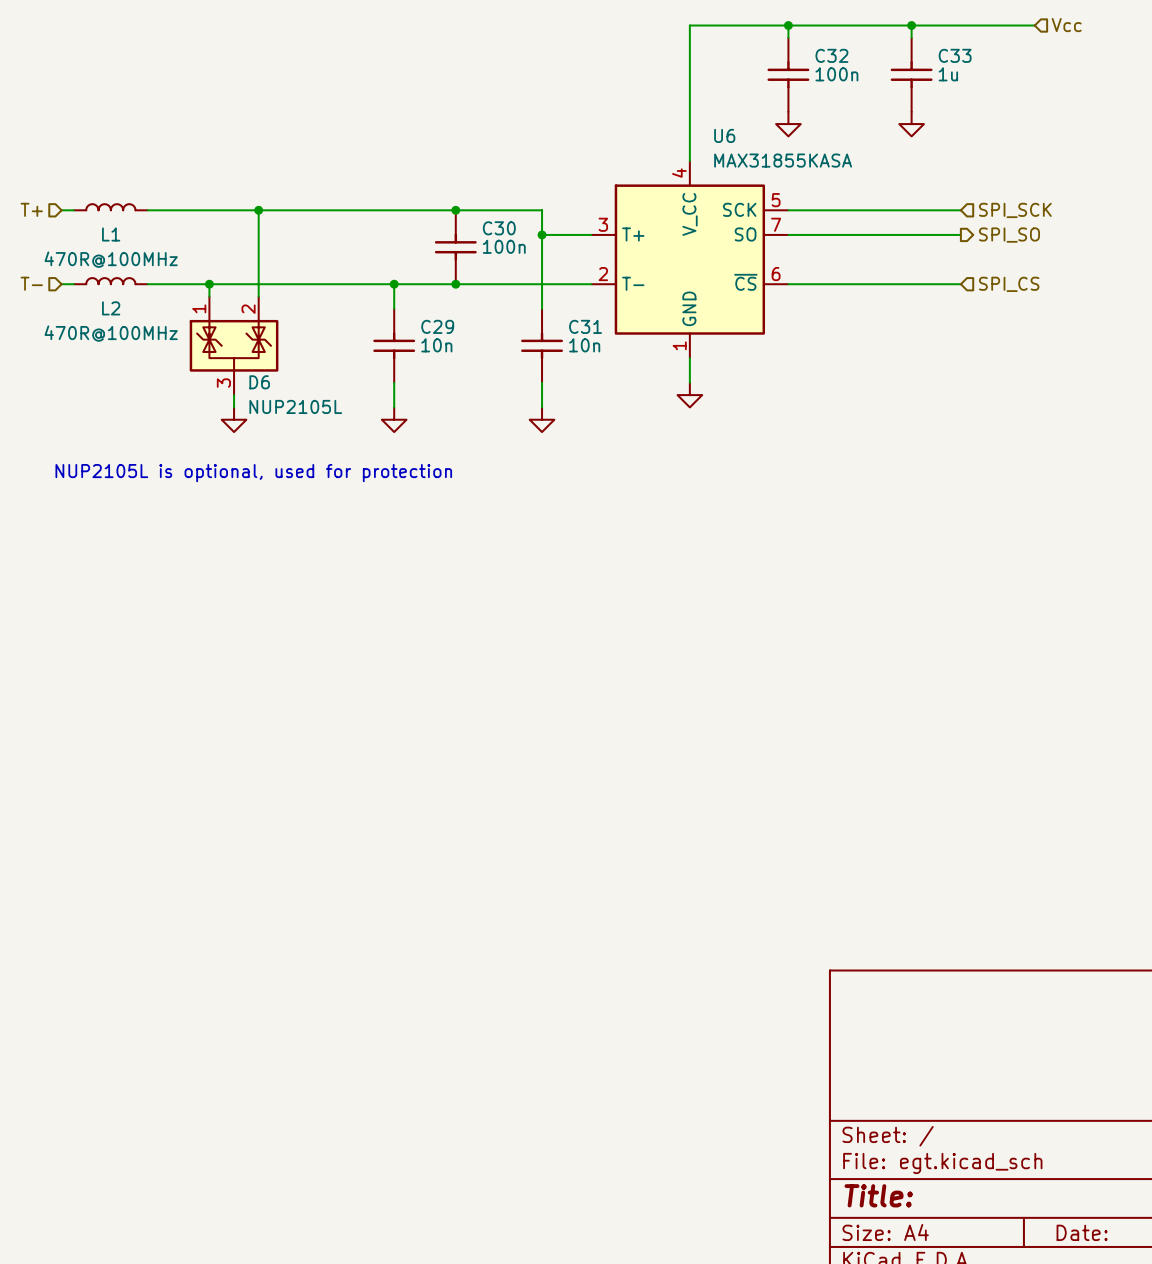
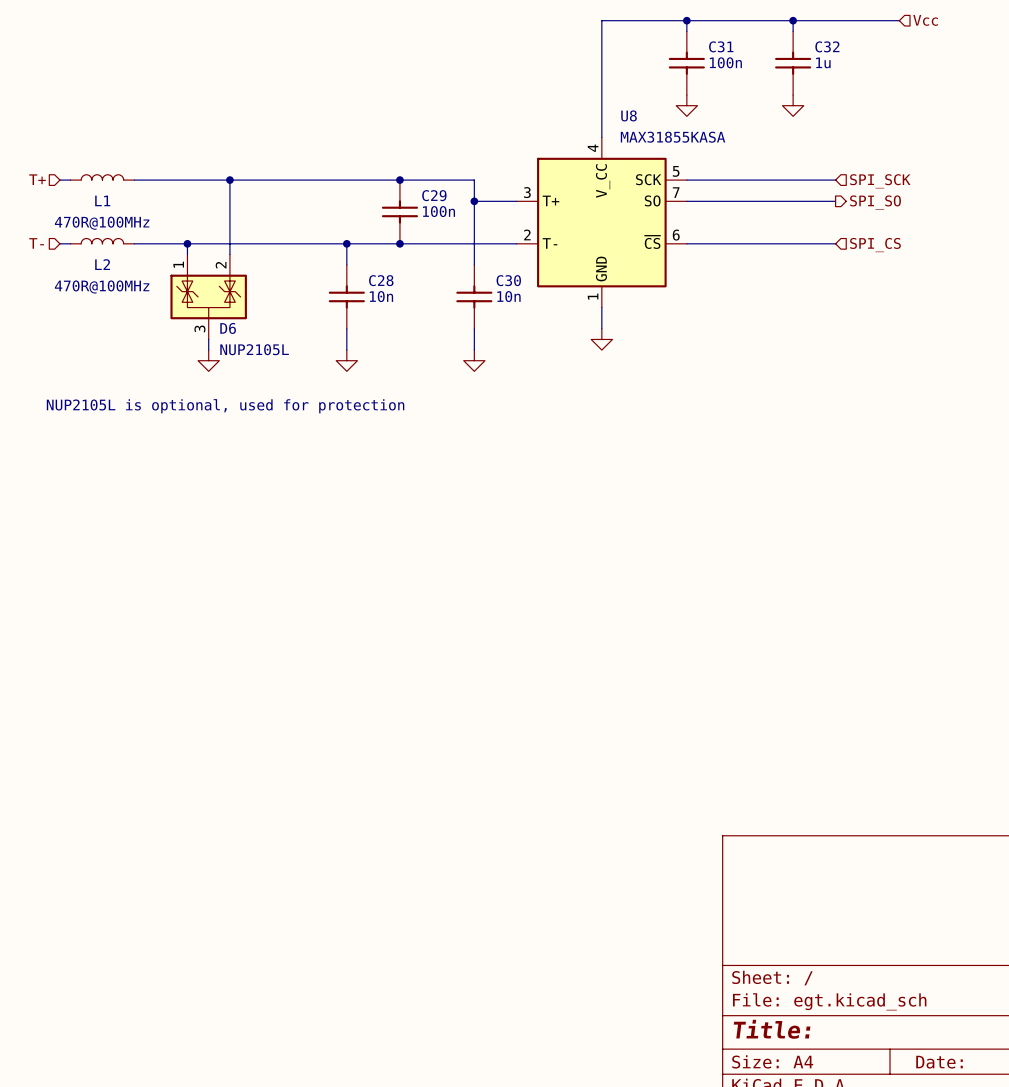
C32 name: C32 (831, 55) -> C31 (721, 46)
C33 name: C33 (955, 55) -> C32 (827, 46)
U6 name: U6 (724, 135) -> U8 (629, 115)
C30 name: C30 (499, 228) -> C29 (434, 195)
C29 name: C29 (437, 326) -> C28 (381, 280)
C31 name: C31 (585, 326) -> C30 (508, 280)

